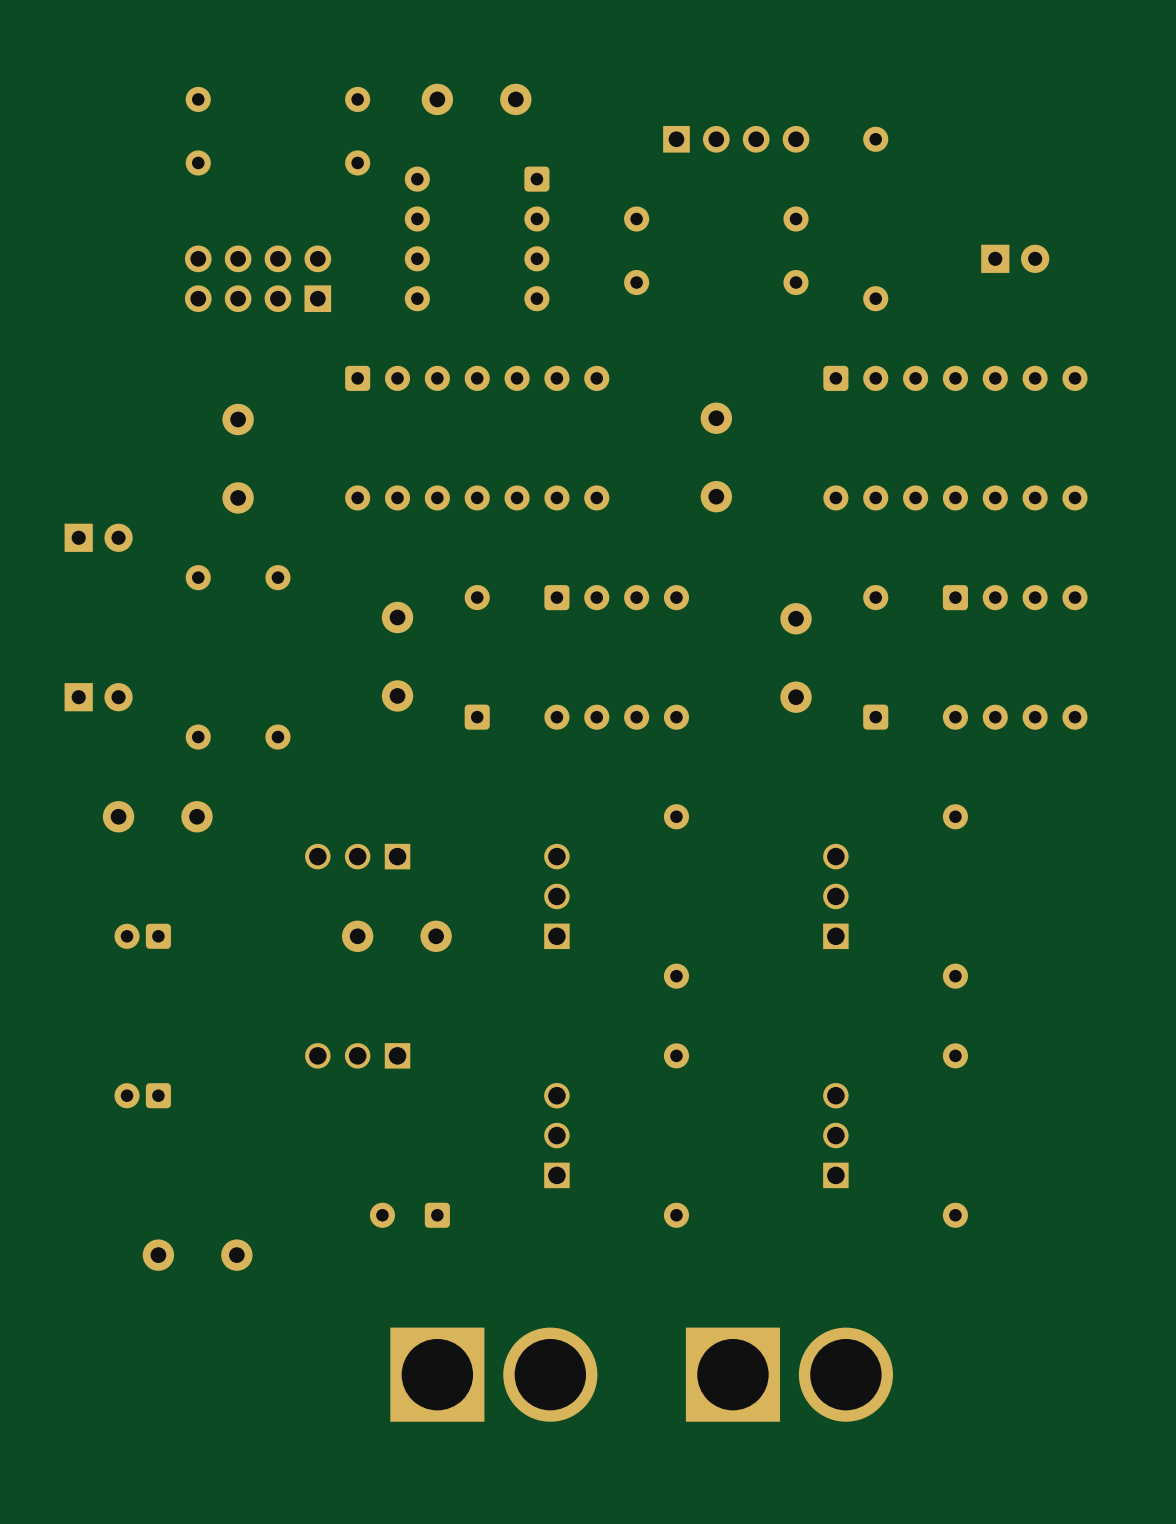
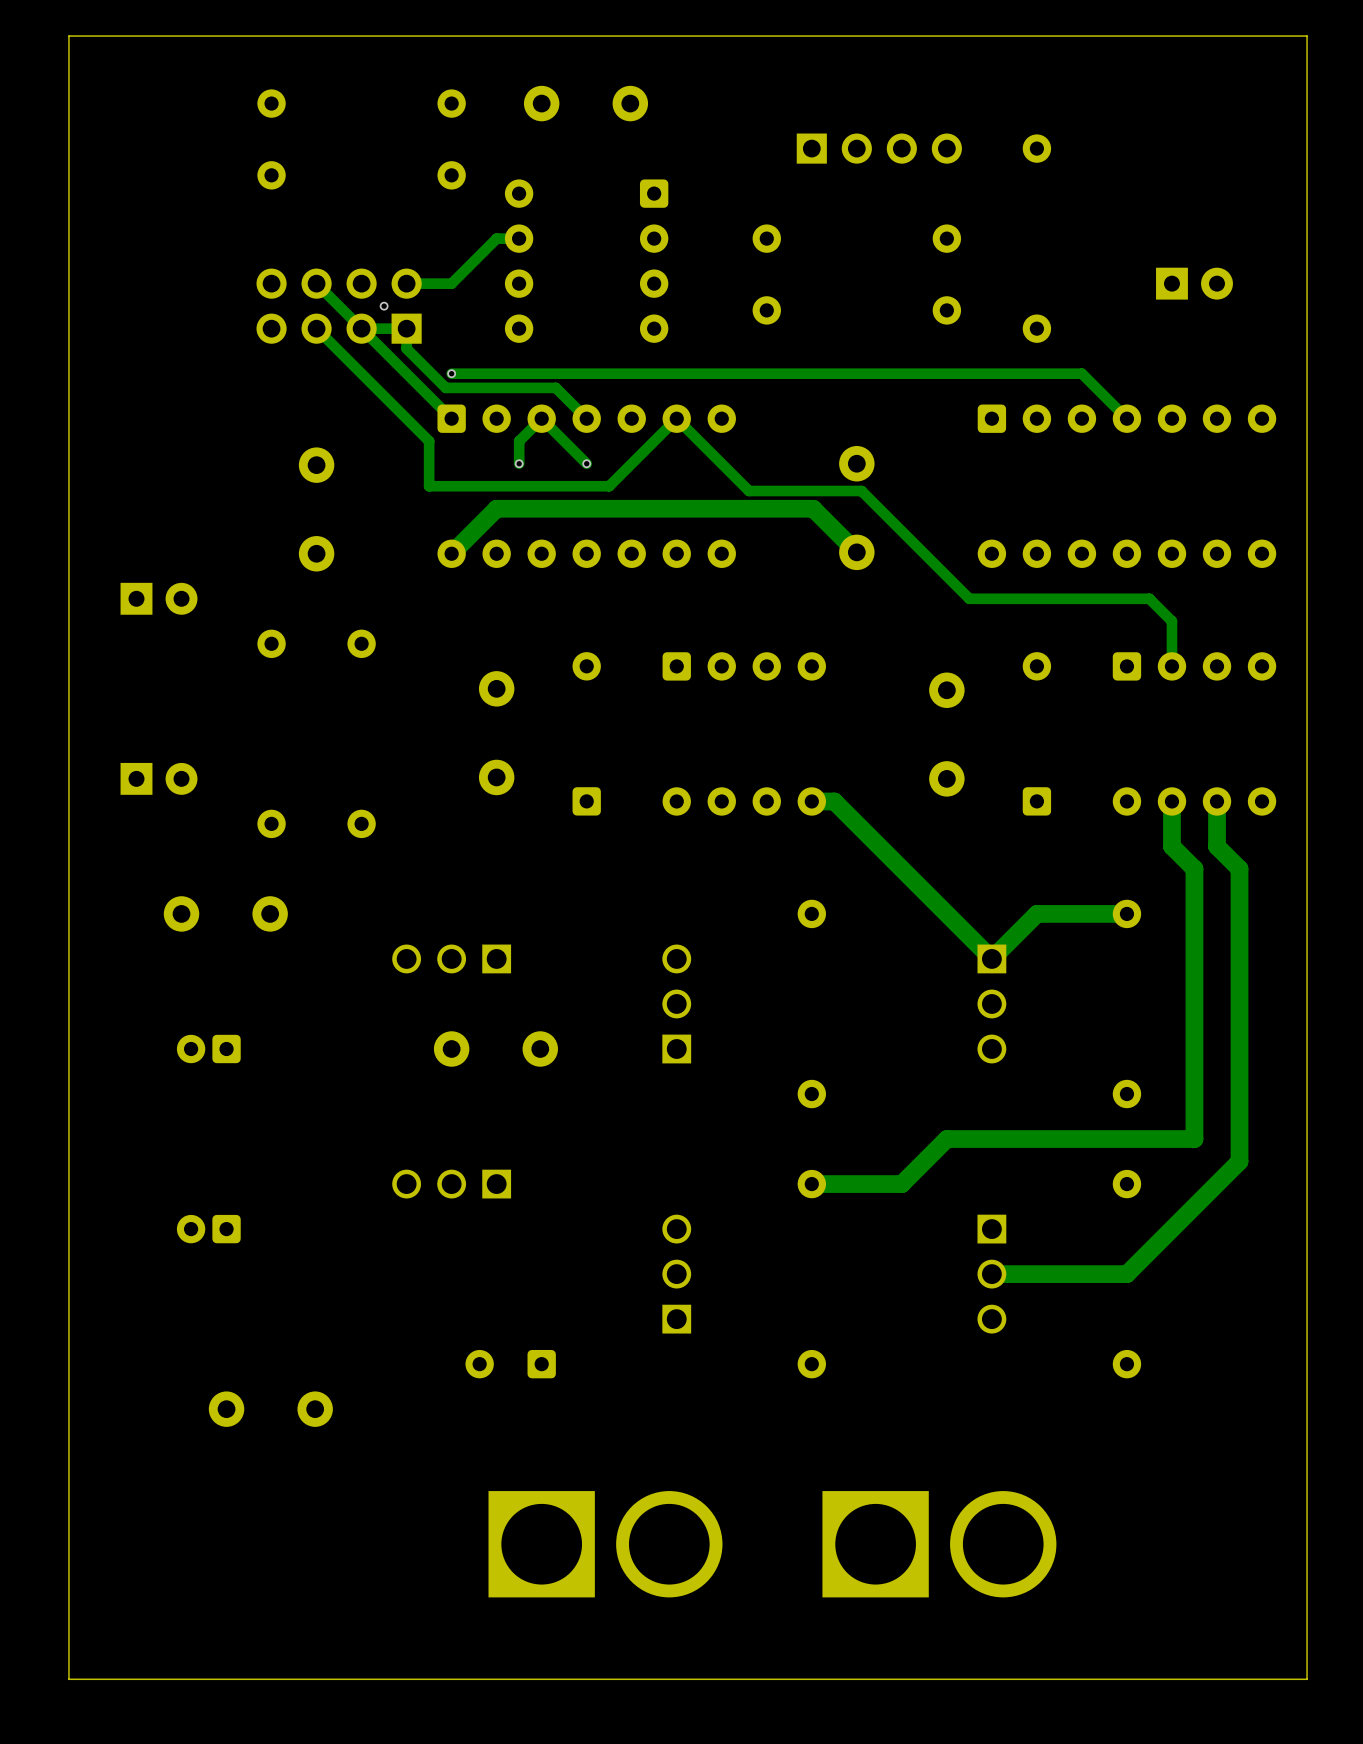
board edge: none -> (1307, 36) (68, 36) (68, 1679) (1307, 1679) (1307, 36)
track: none -> (519, 238) (496, 238) (451, 283) (406, 283)
track: none -> (316, 283) (451, 418)
via: none -> (384, 306)
track: none -> (316, 328) (429, 441) (429, 486) (609, 486) (676, 418) (749, 491) (861, 491) (969, 598) (1149, 598) (1171, 621) (1171, 666)
track: none -> (361, 328) (406, 328) (406, 348) (445, 387) (555, 387) (586, 418)
track: none -> (451, 373) (1081, 373) (1126, 418)
via: none -> (451, 373)
via: none -> (519, 463)
track: none -> (586, 463) (541, 418) (519, 441) (519, 463)
via: none -> (586, 463)
track: none -> (856, 552) (813, 508) (496, 508) (451, 553)
track: none -> (811, 801) (834, 801) (991, 958) (1036, 913) (1126, 913)
track: none -> (1171, 801) (1171, 846) (1194, 868) (1194, 1139) (946, 1139) (901, 1184) (811, 1184)
track: none -> (1217, 801) (1217, 846) (1239, 868) (1239, 1161) (1126, 1274) (991, 1274)
part rotation: 0° (835, 896) -> 180° (991, 1003)
part rotation: 0° (835, 1135) -> 180° (991, 1274)

